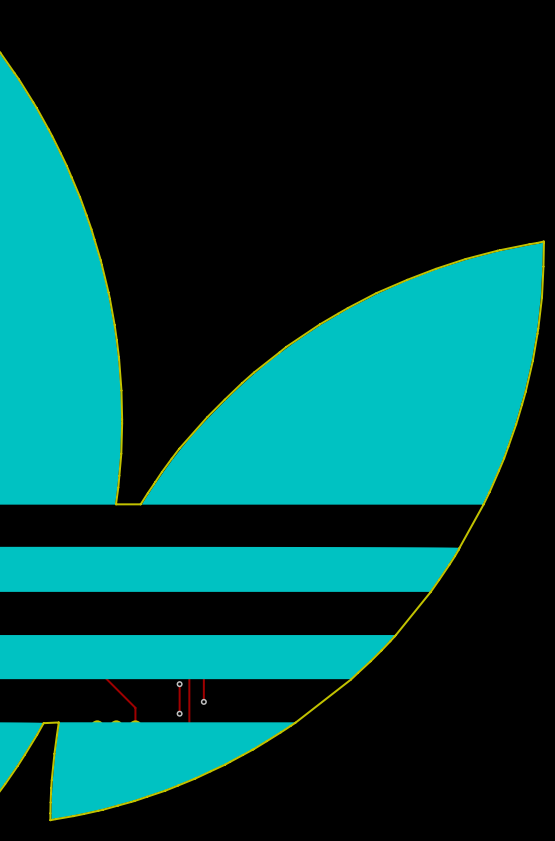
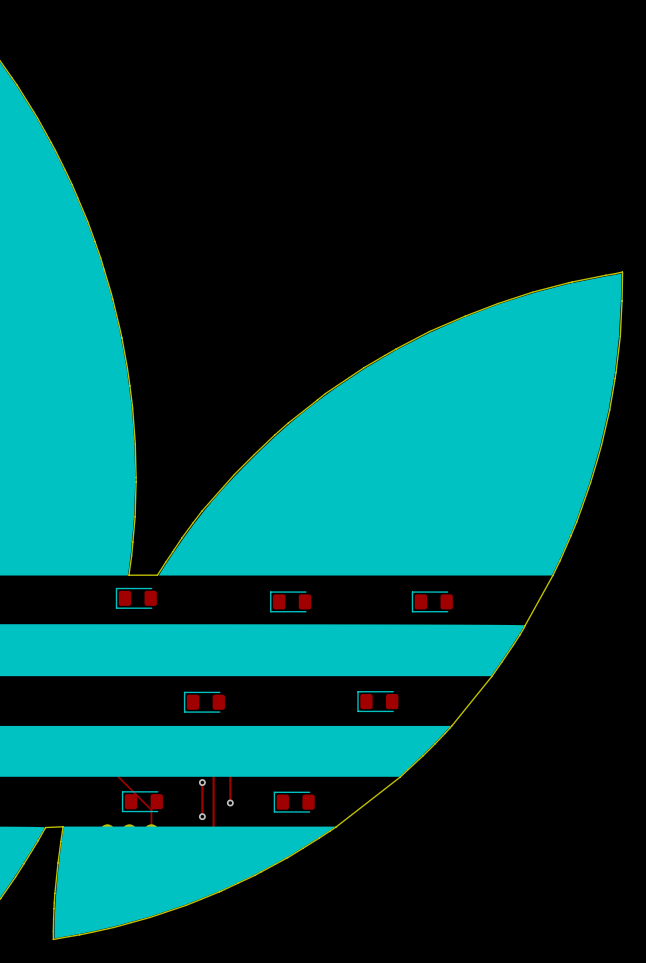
part: none -> (136, 598)
part: none -> (290, 601)
part: none -> (432, 601)
part: none -> (377, 701)
part: none -> (204, 702)
part: none -> (142, 801)
part: none -> (294, 802)

